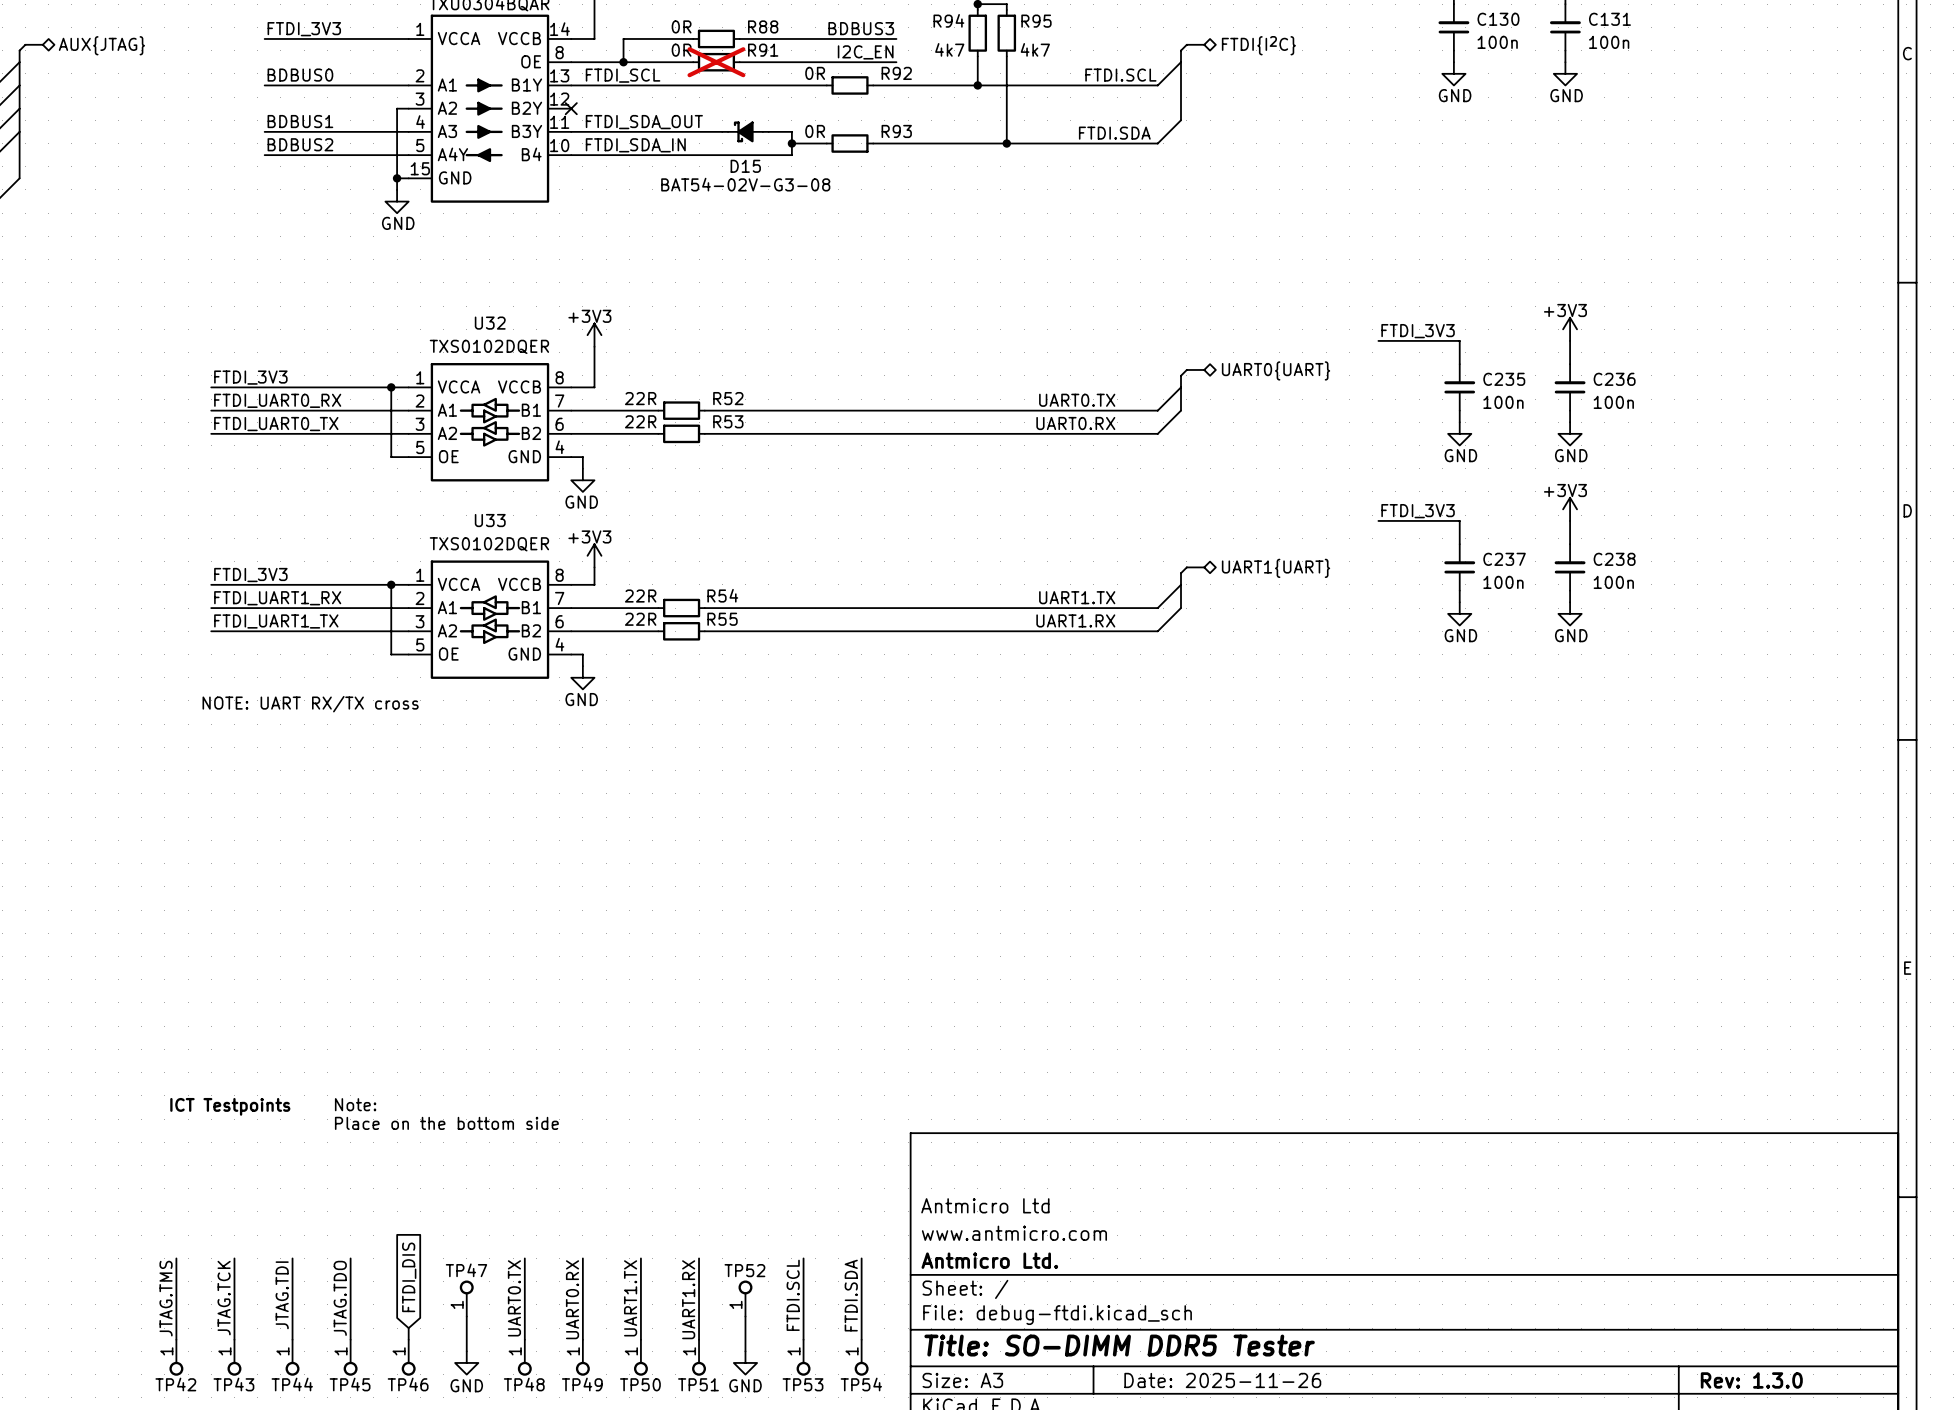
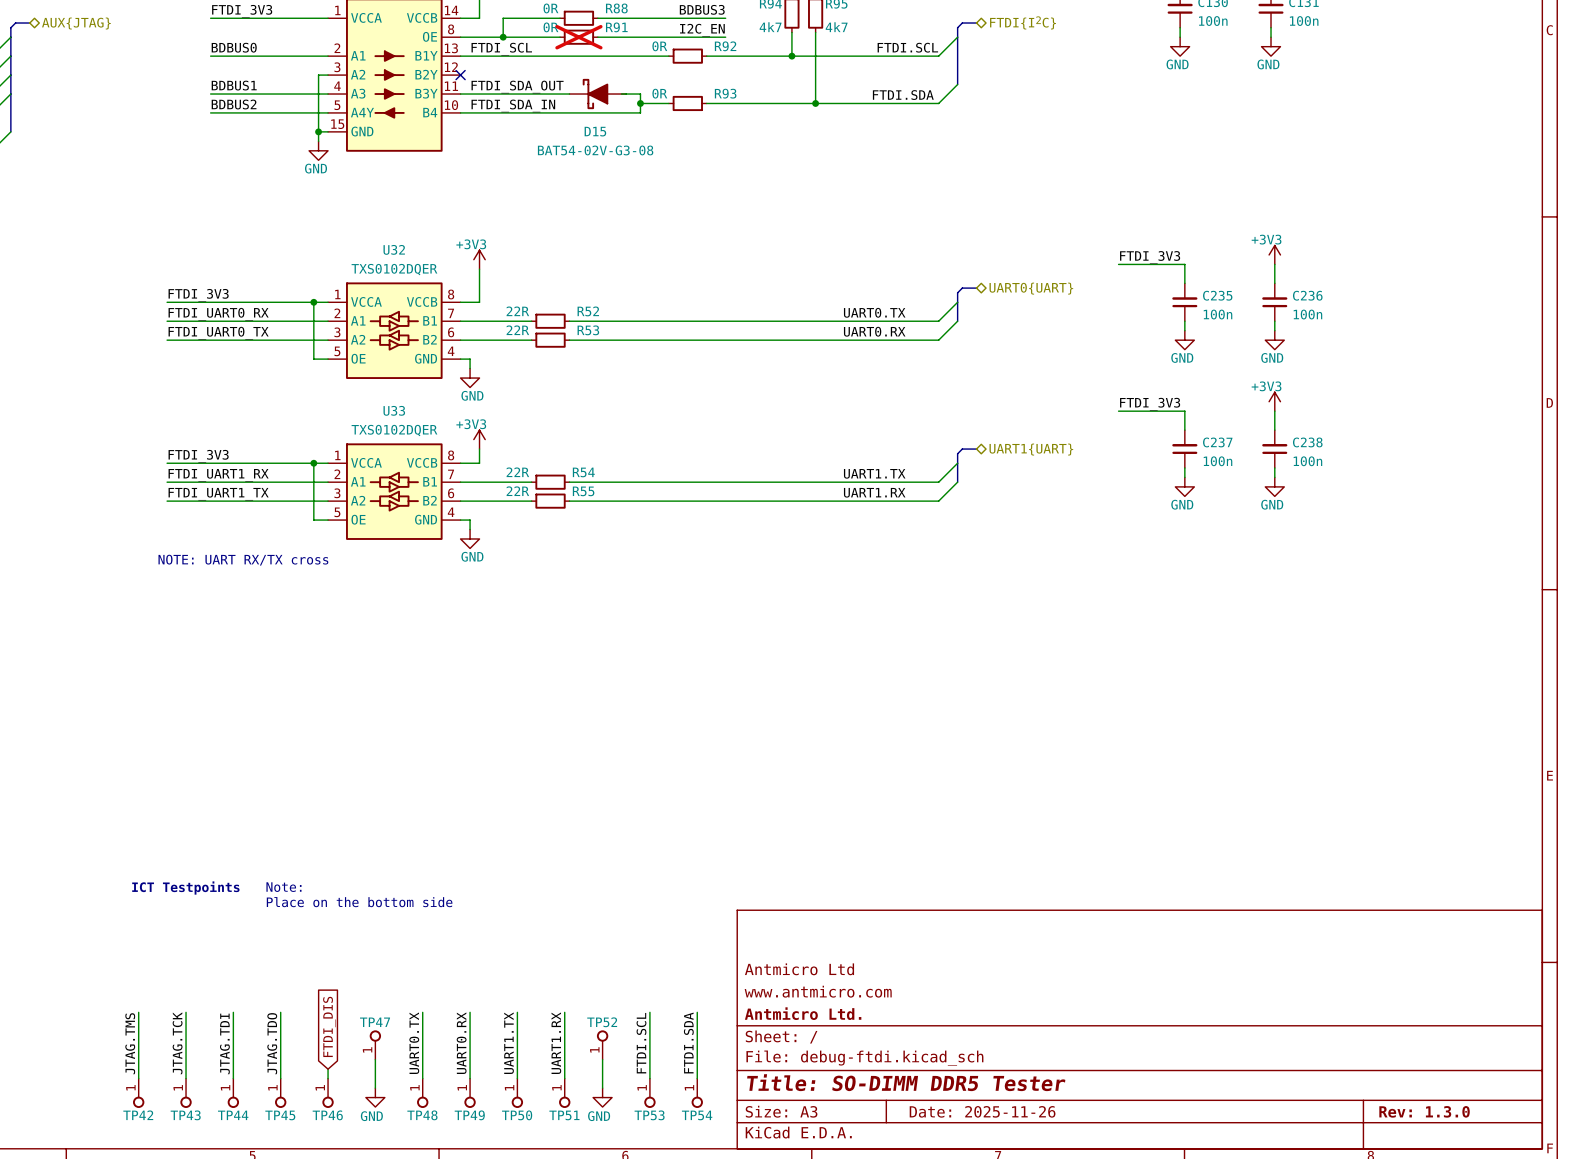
D15 symbol: [722, 121, 769, 143] -> [569, 78, 627, 110]
D15 text: BAT54-02V-G3-08 (745, 184) -> none
D15 value: none -> BAT54-02V-G3-08 (595, 150)

